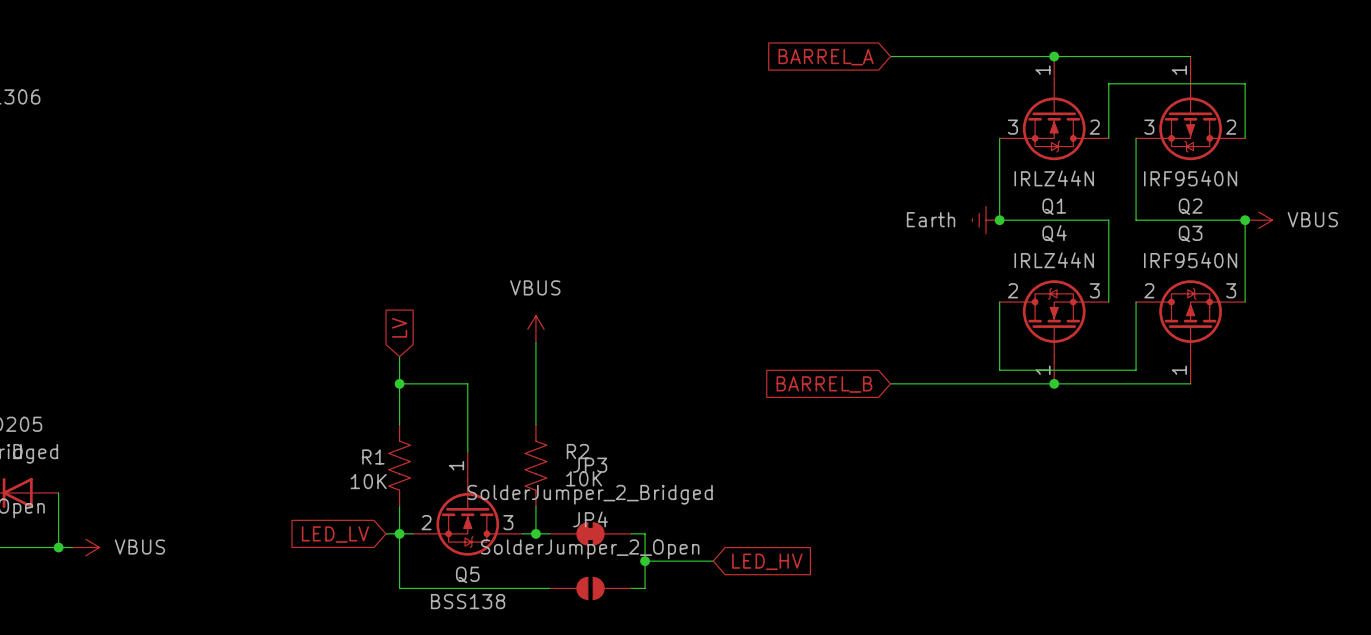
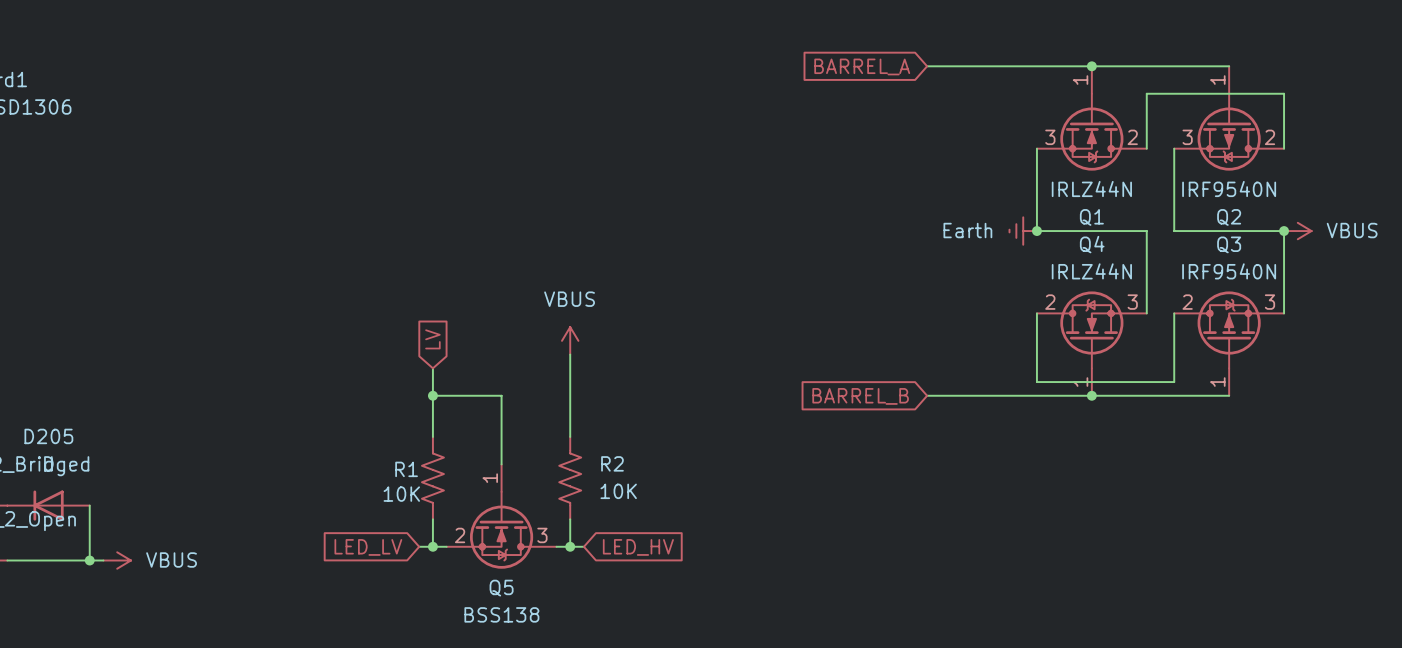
wire: (399, 533) (399, 588) (549, 588) -> none
JP3: SolderJumper_2_Bridged (590, 533) -> none
wire: (631, 533) (645, 533) (645, 588) (631, 588) -> none
wire: (645, 561) (713, 561) -> none
junction: (645, 561) -> none
global label position: LED_HV (767, 561) -> LED_HV (638, 547)
JP4: SolderJumper_2_Open (590, 588) -> none

